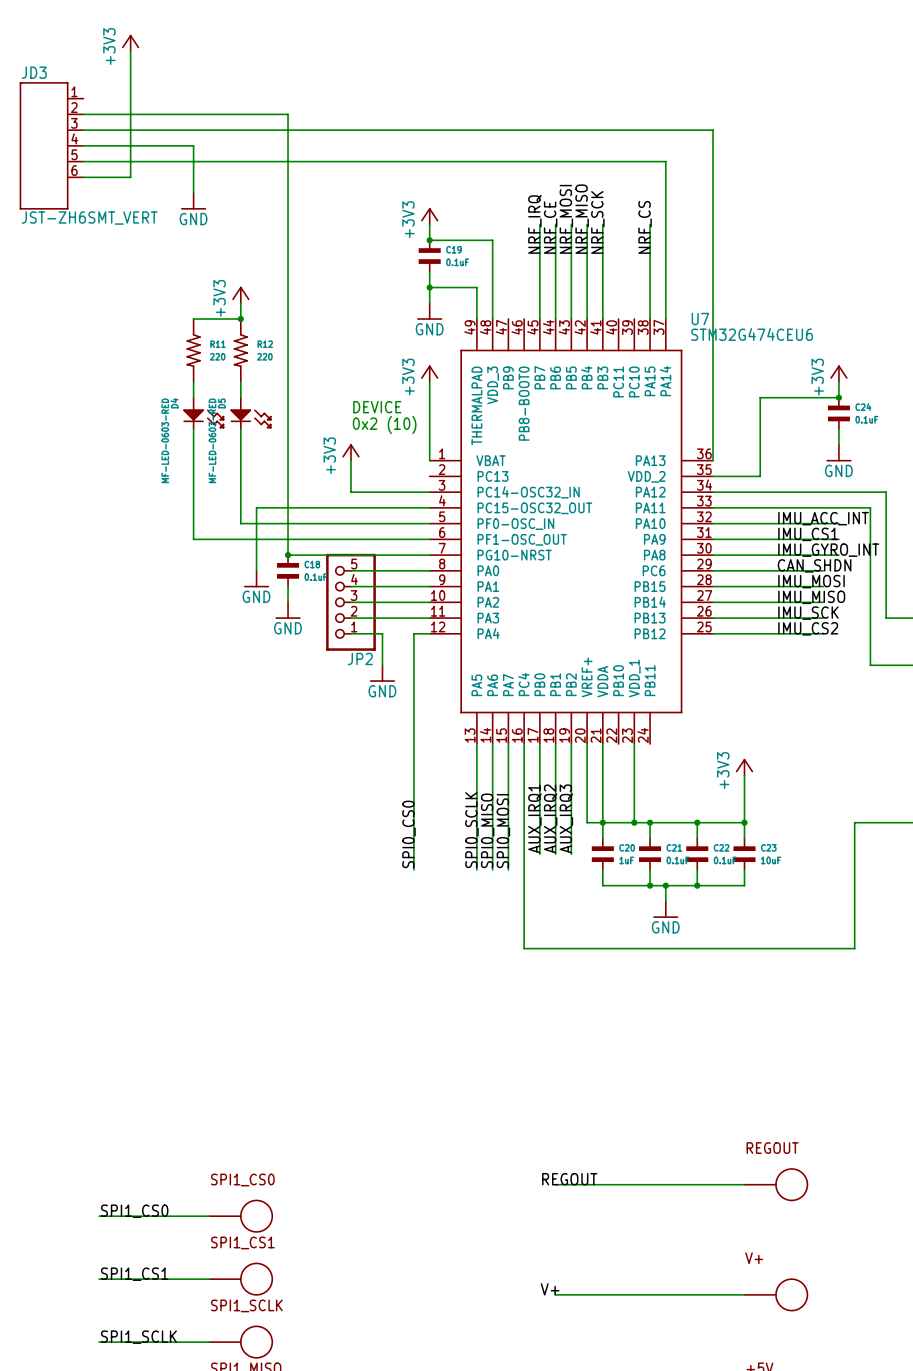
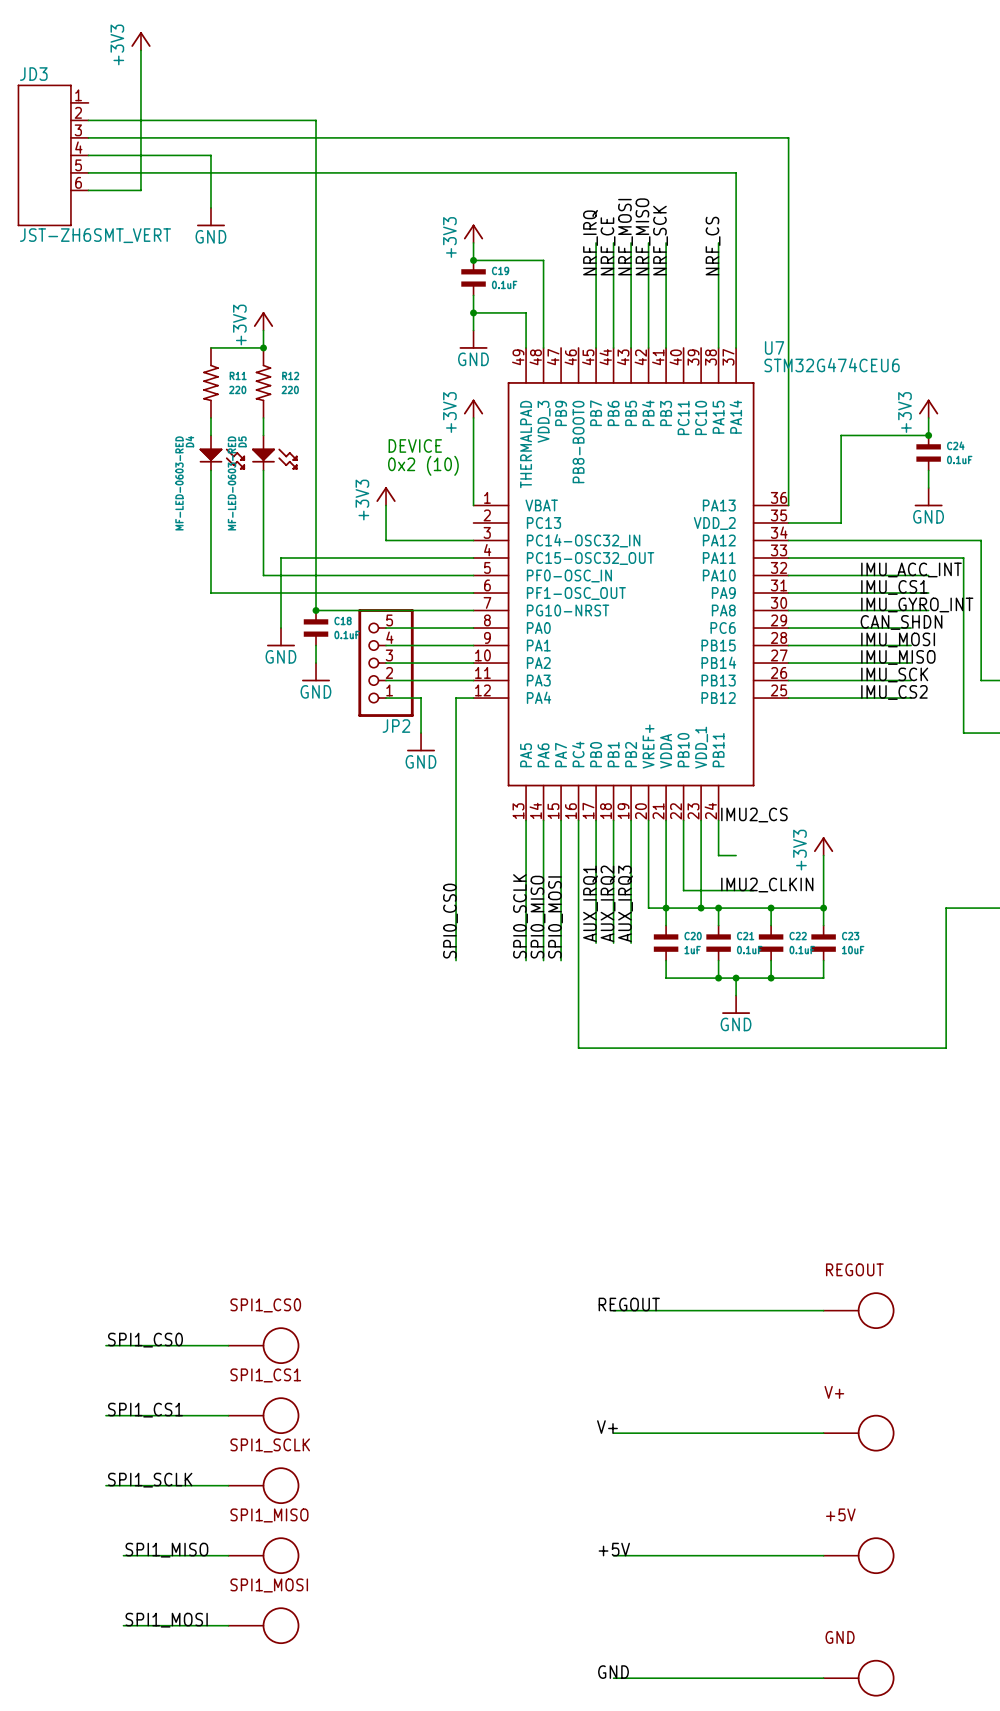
label: none -> IMU2_CS (754, 815)
wire: none -> (683, 820) (683, 890) (753, 890)
wire: none -> (718, 820) (718, 855) (736, 855)
label: none -> IMU2_CLKIN (767, 885)

